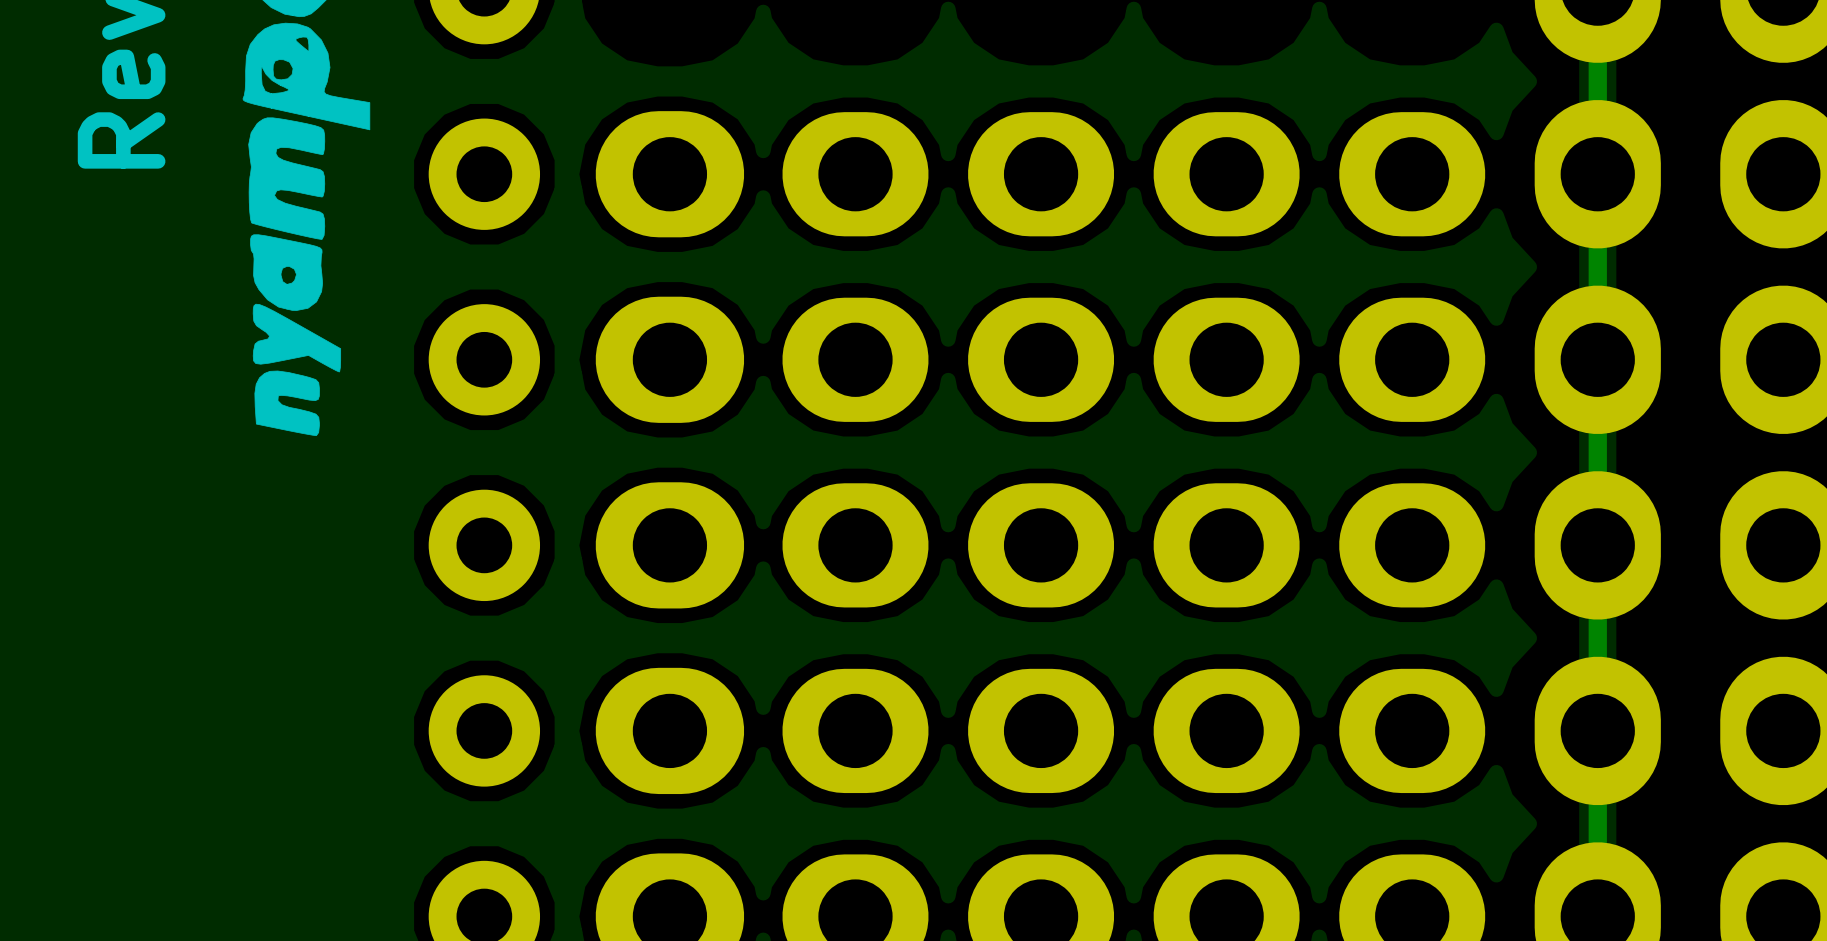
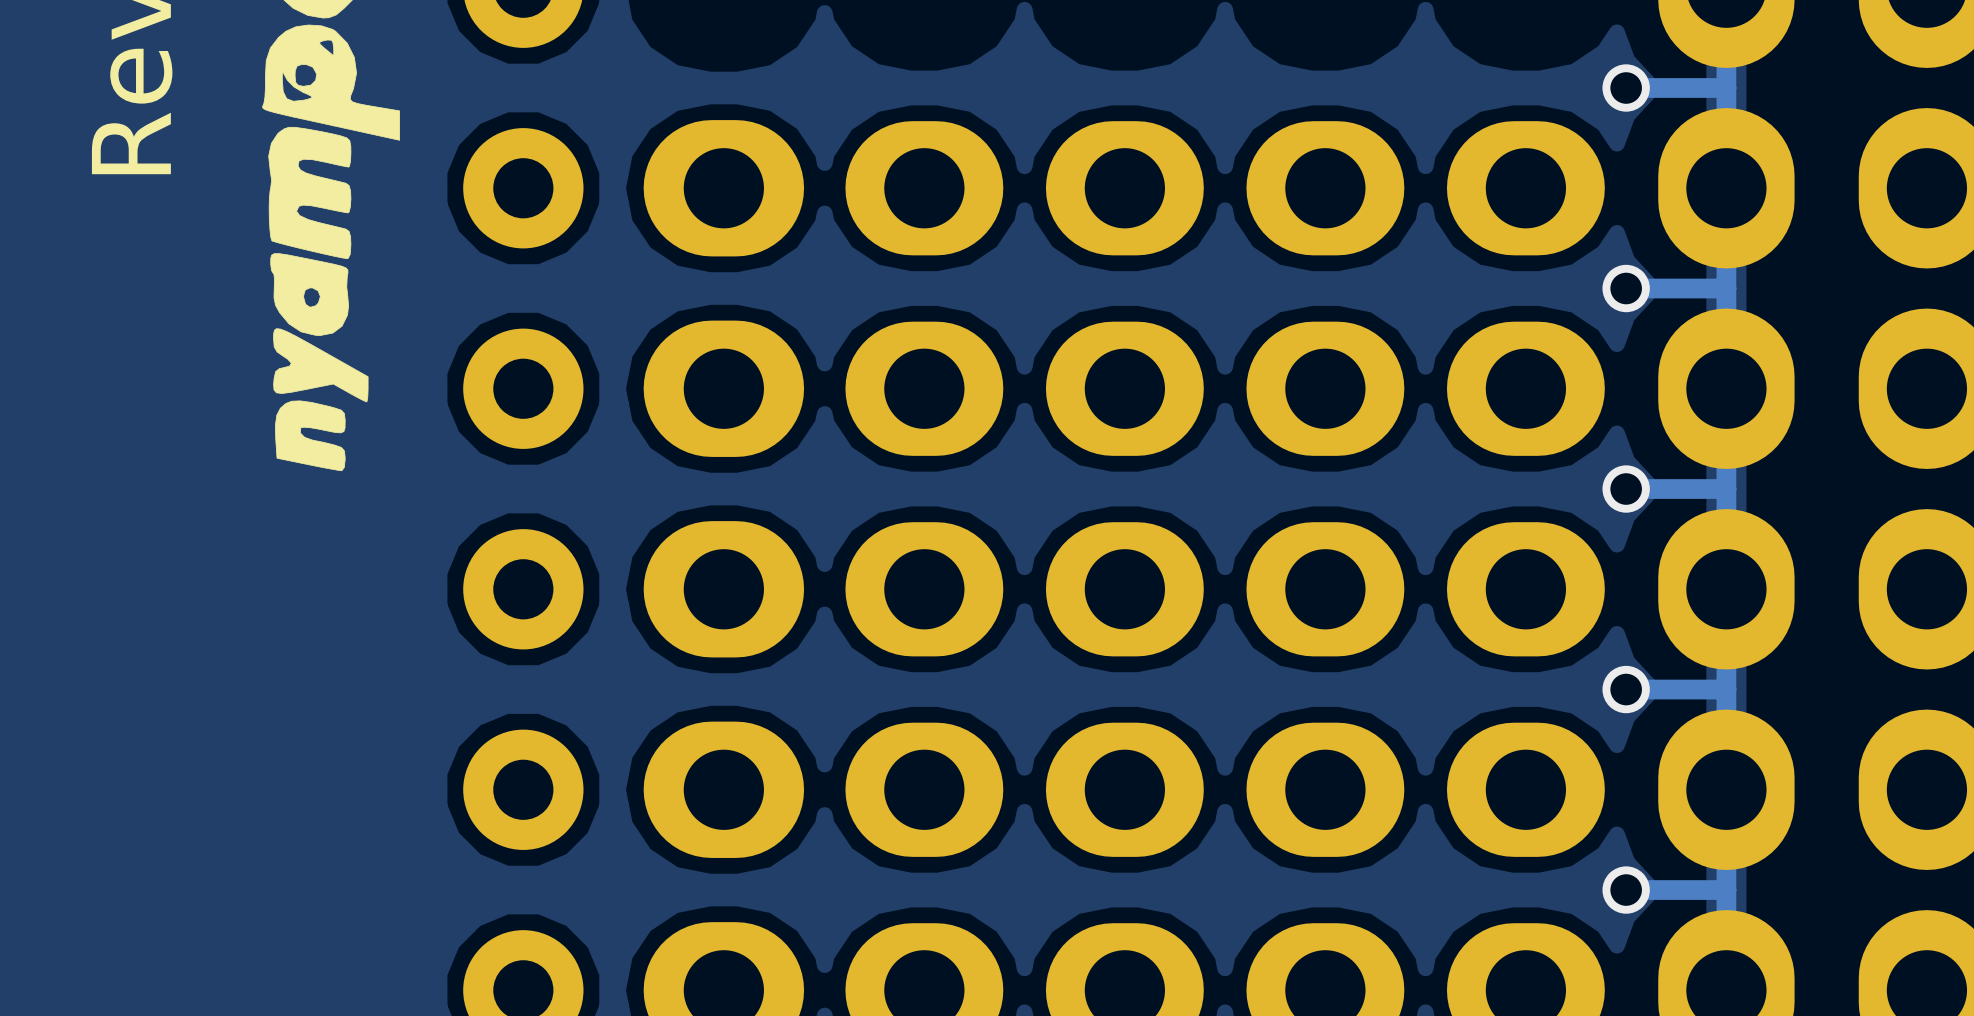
via: none -> (1626, 88)
track: none -> (1726, 88) (1626, 88)
via: none -> (1626, 288)
track: none -> (1726, 288) (1626, 288)
via: none -> (1626, 489)
track: none -> (1726, 489) (1626, 489)
via: none -> (1626, 689)
track: none -> (1726, 689) (1626, 689)
via: none -> (1626, 890)
track: none -> (1726, 890) (1626, 890)

